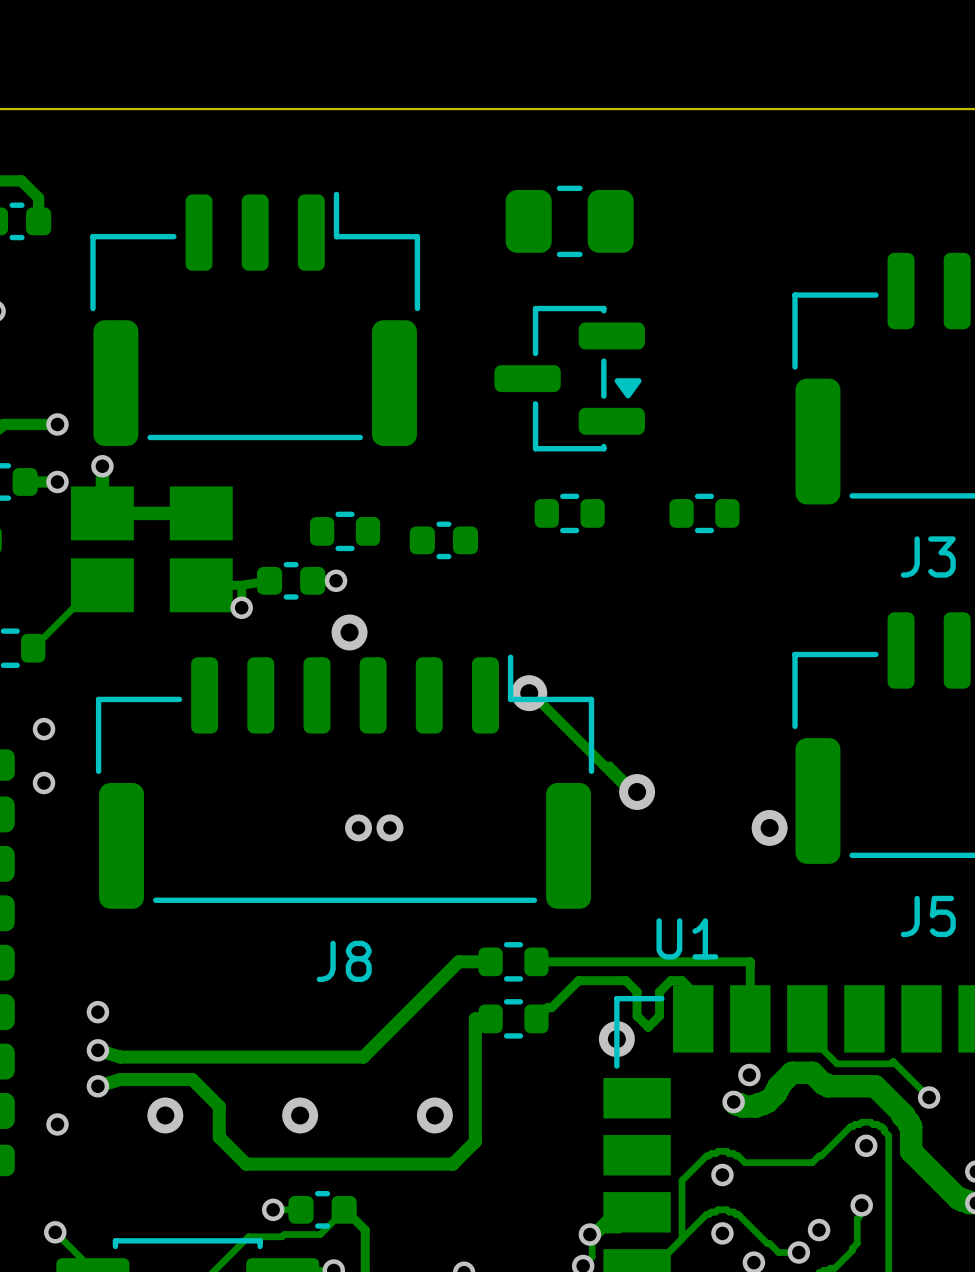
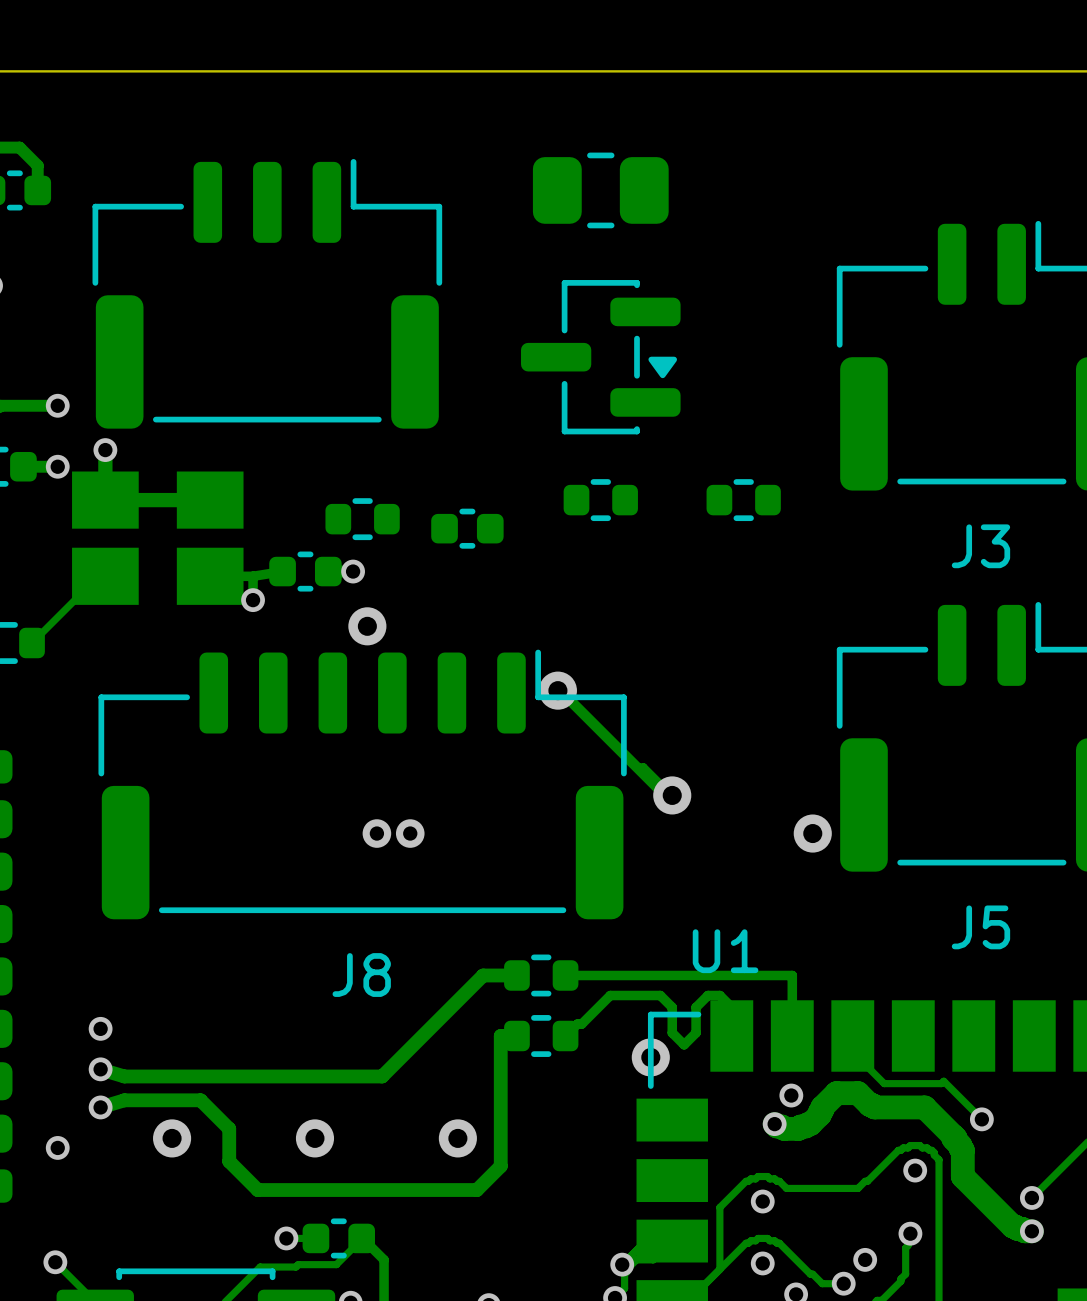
via: (44, 729) -> none
via: (44, 783) -> none

